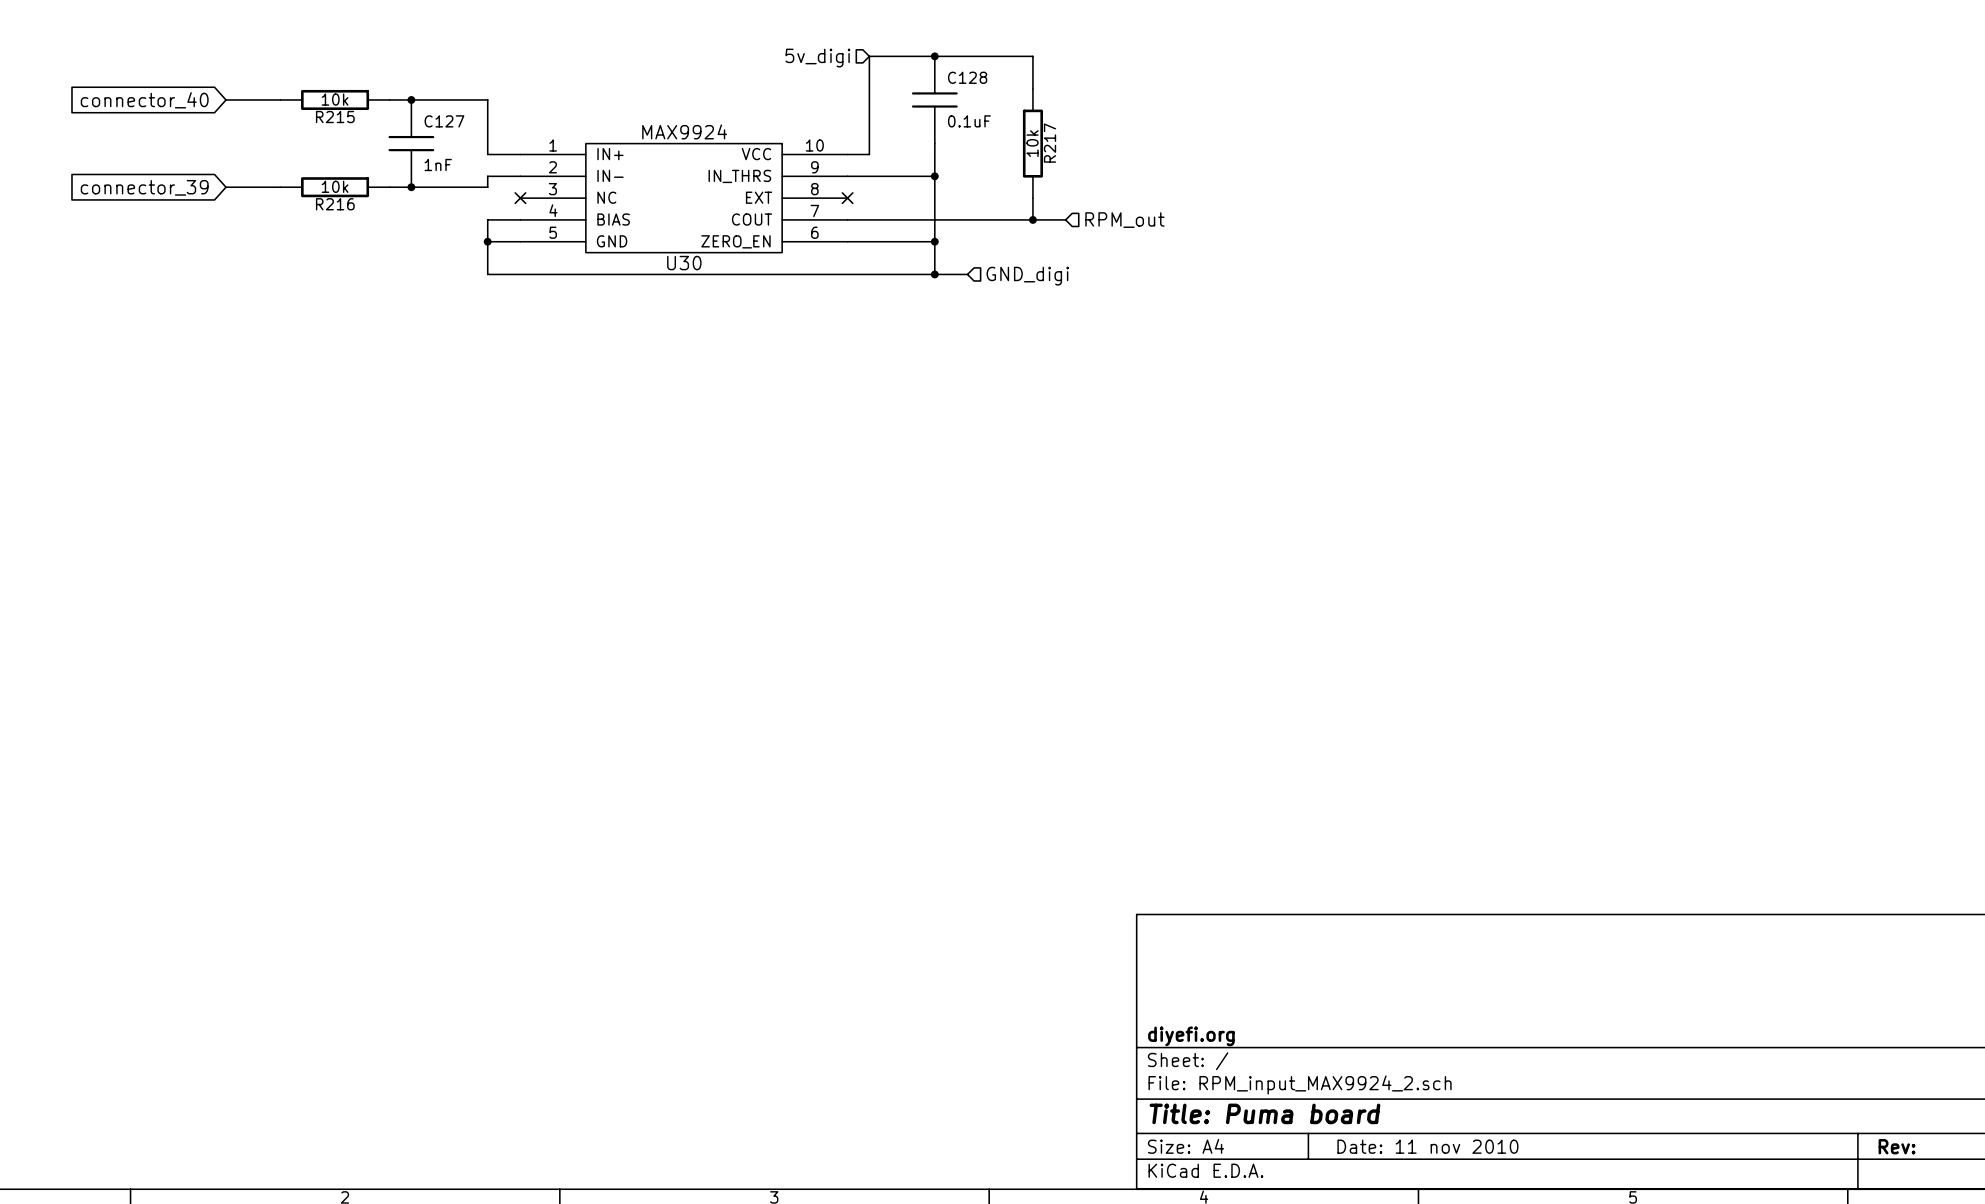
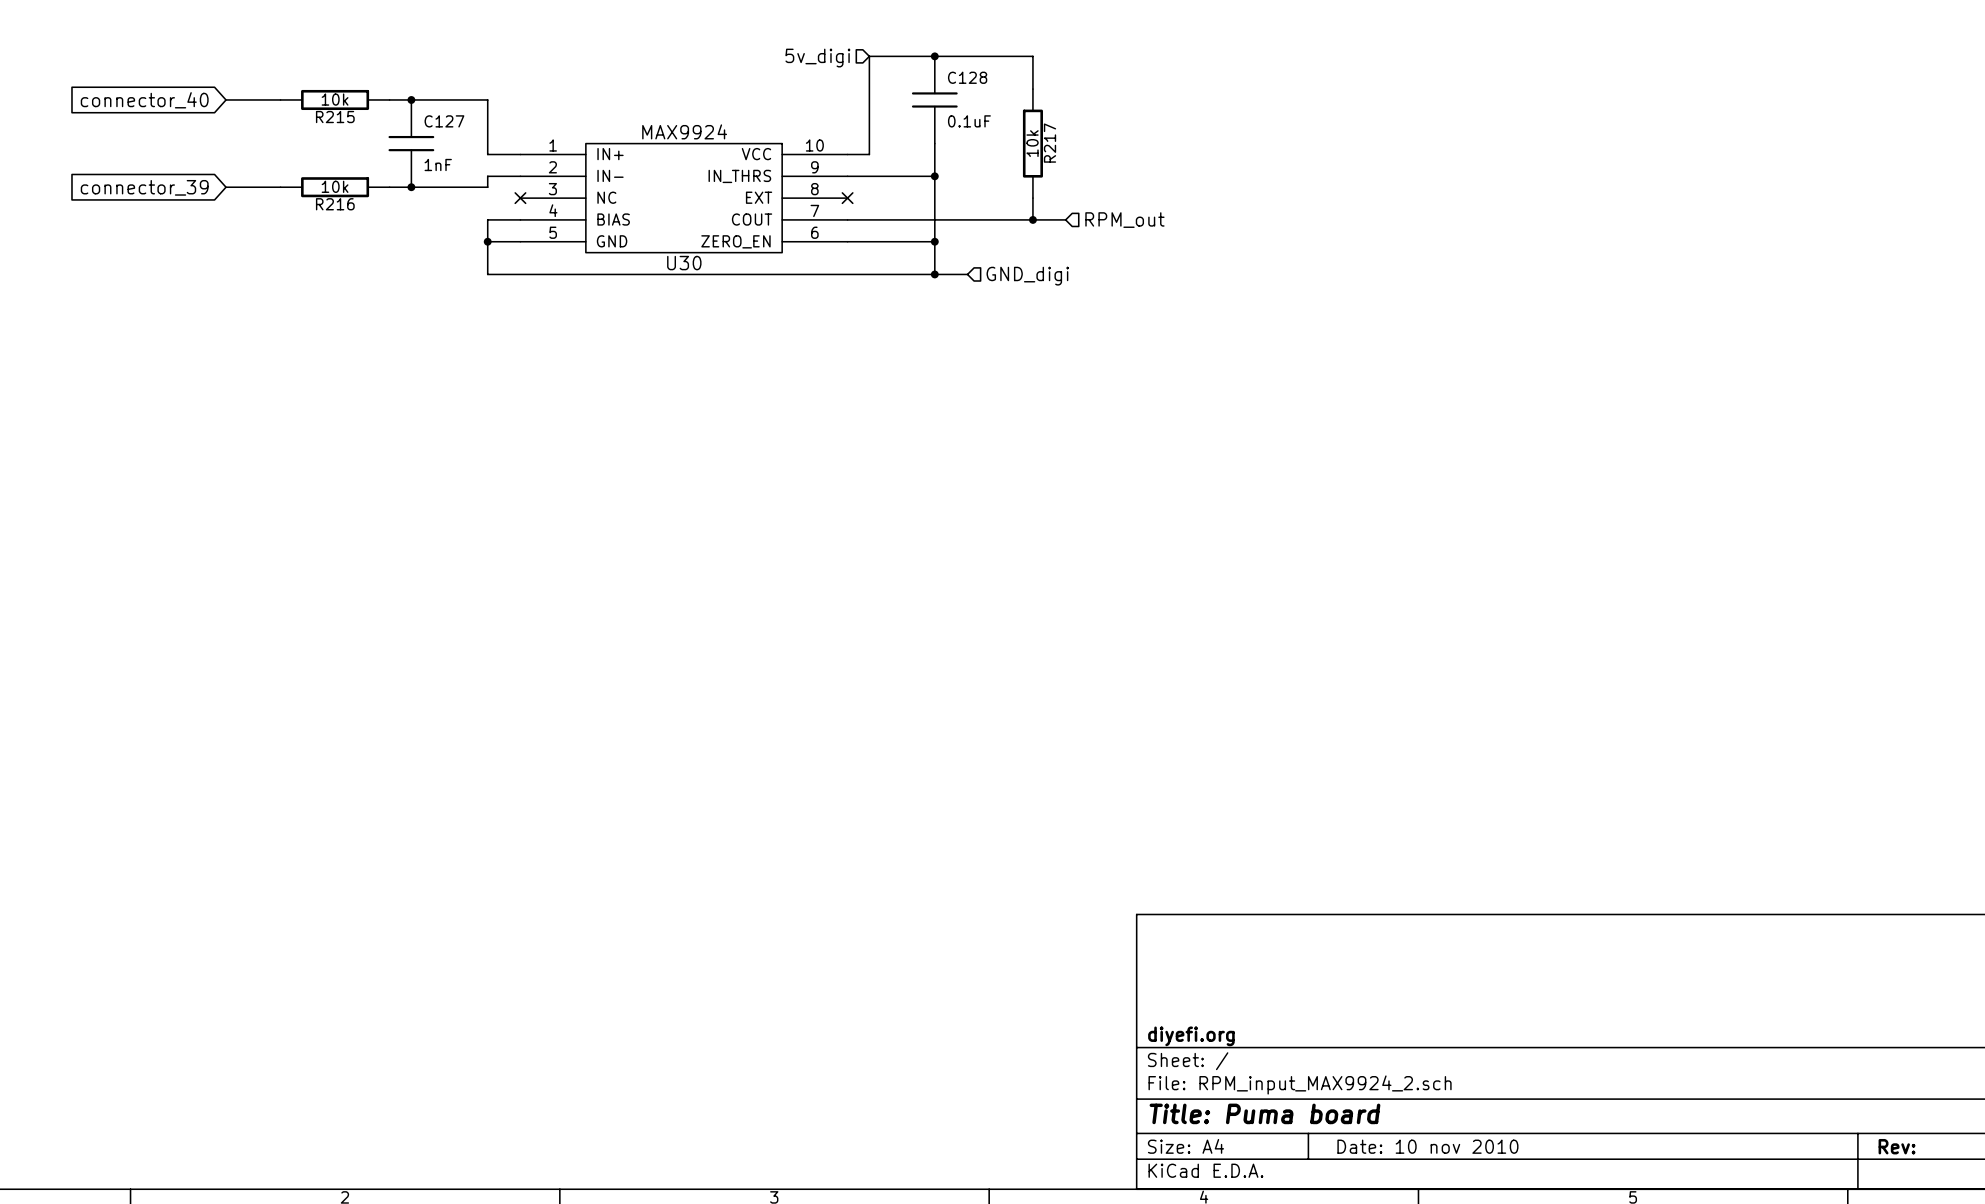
title block: Date: 11 nov 2010 (1427, 1146) -> Date: 10 nov 2010 (1427, 1146)

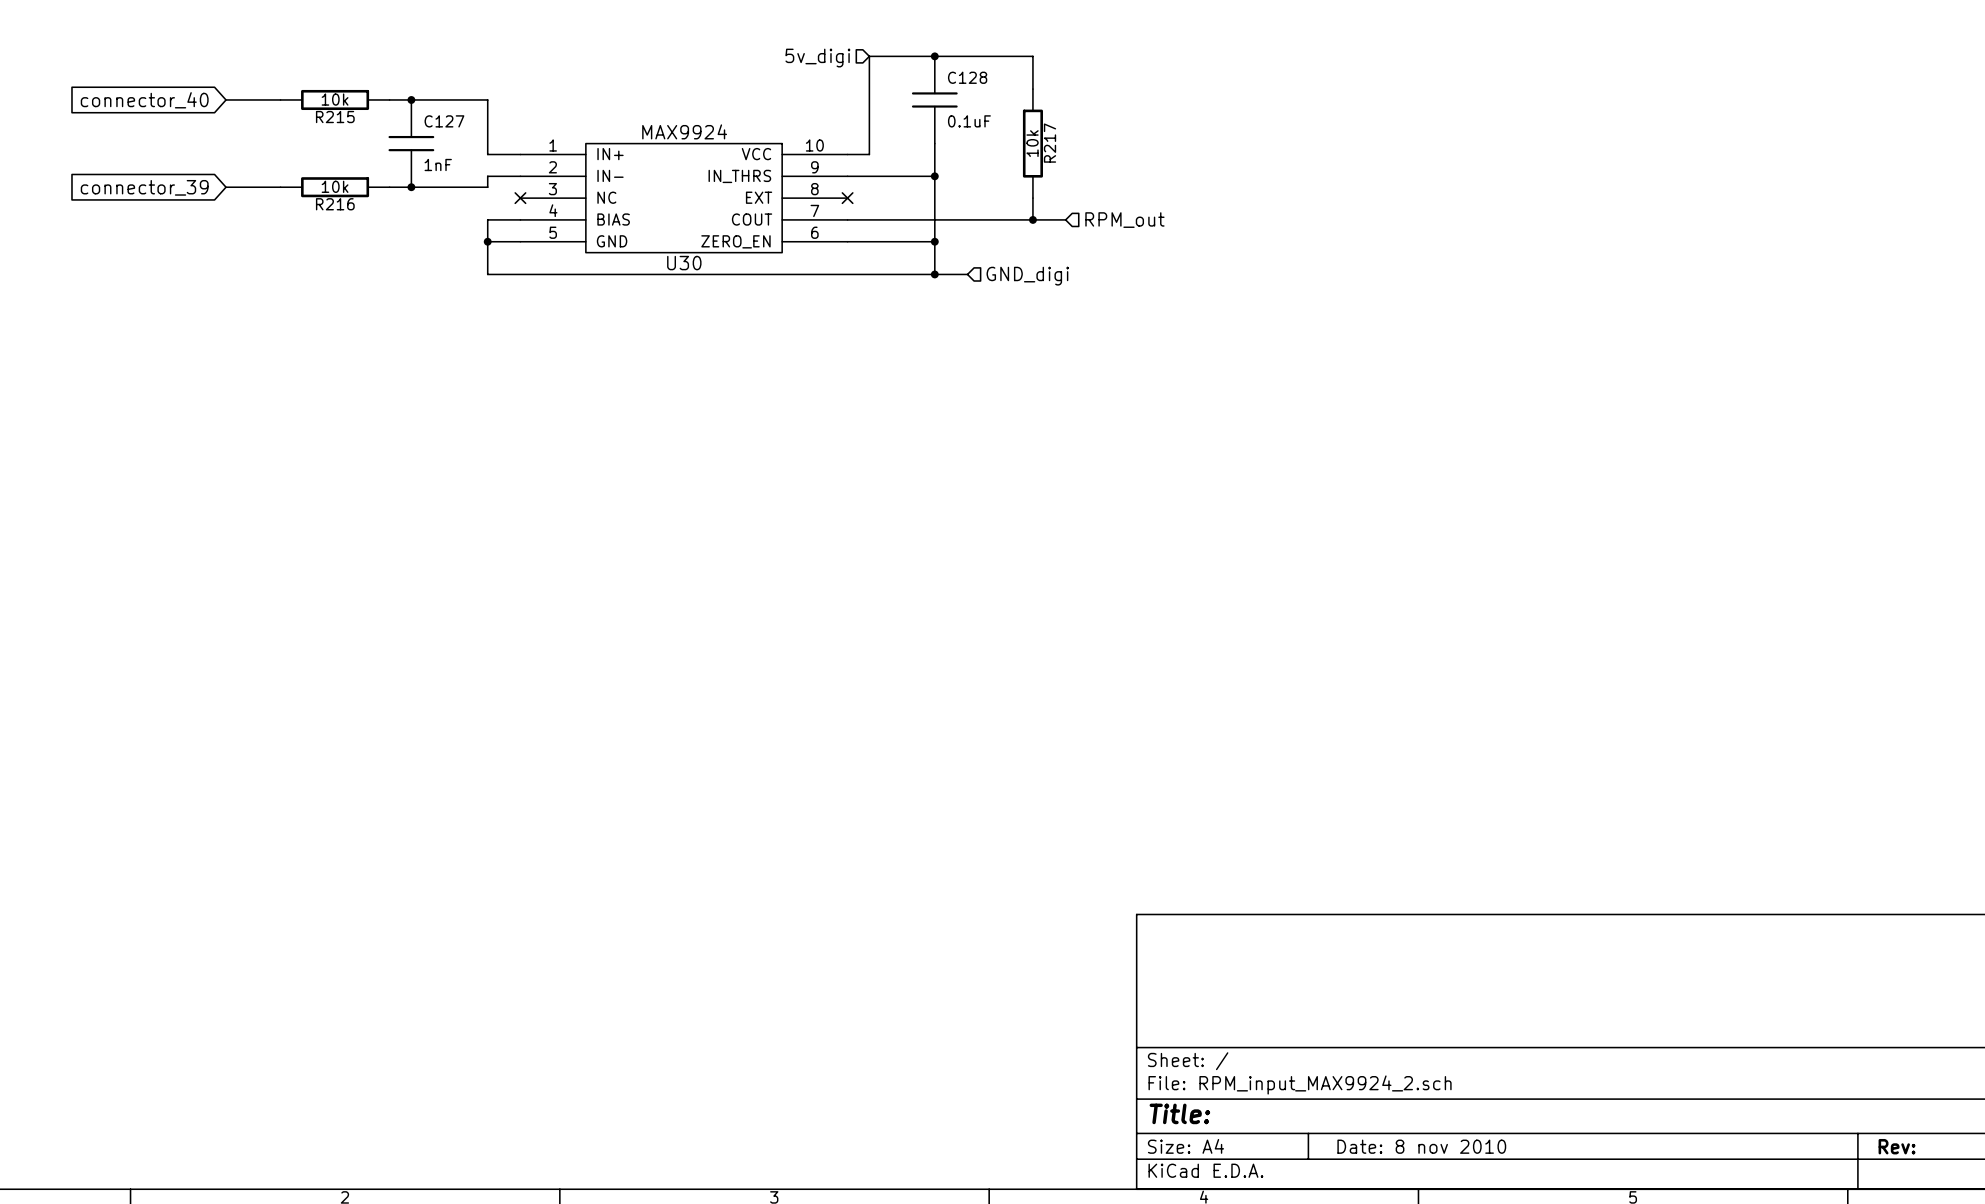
title block: diyefi.org (1191, 1036) -> none
title block: Title: Puma board (1264, 1113) -> Title: (1179, 1113)
title block: Date: 10 nov 2010 (1427, 1146) -> Date: 8 nov 2010 (1421, 1146)

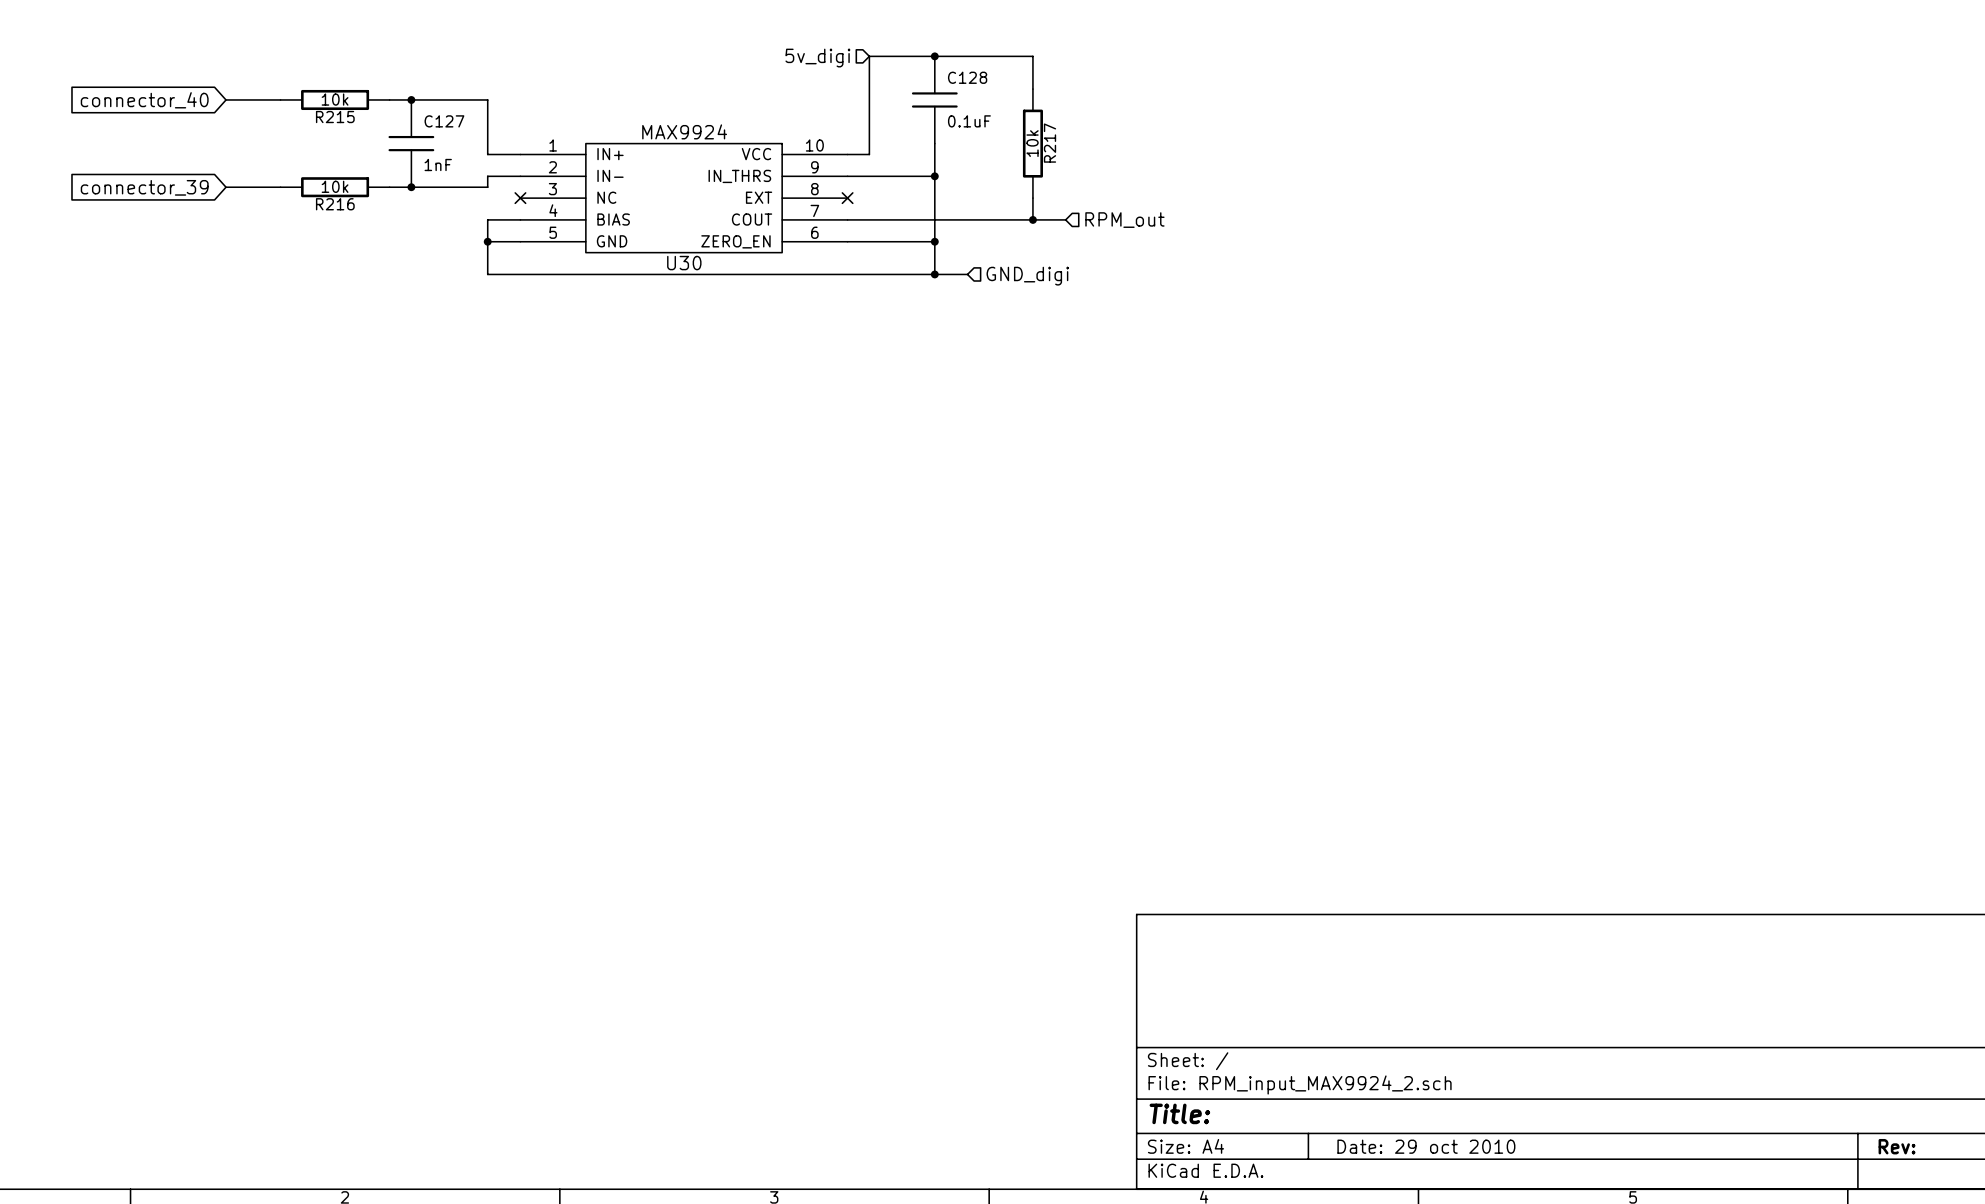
title block: Date: 8 nov 2010 (1421, 1146) -> Date: 29 oct 2010 (1426, 1146)

